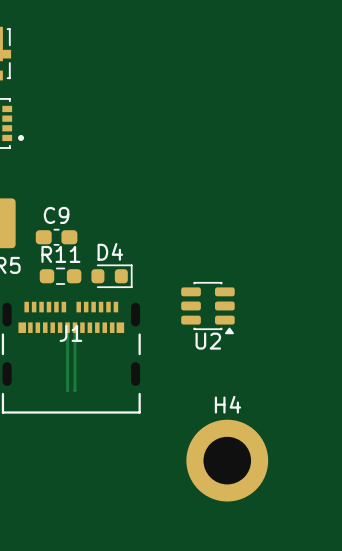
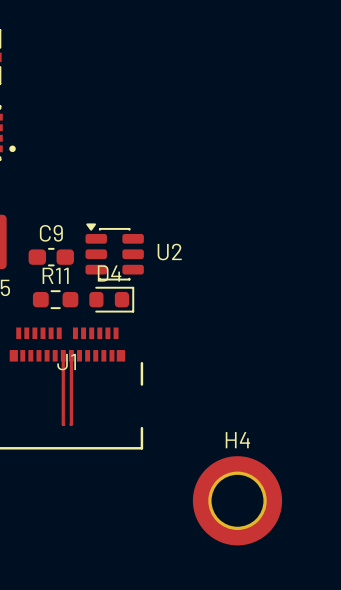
U2 rotation: 0° (207, 308) -> 180° (114, 251)
U2 position: (207, 308) -> (114, 251)
U2 name position: U2 (208, 341) -> U2 (169, 252)

